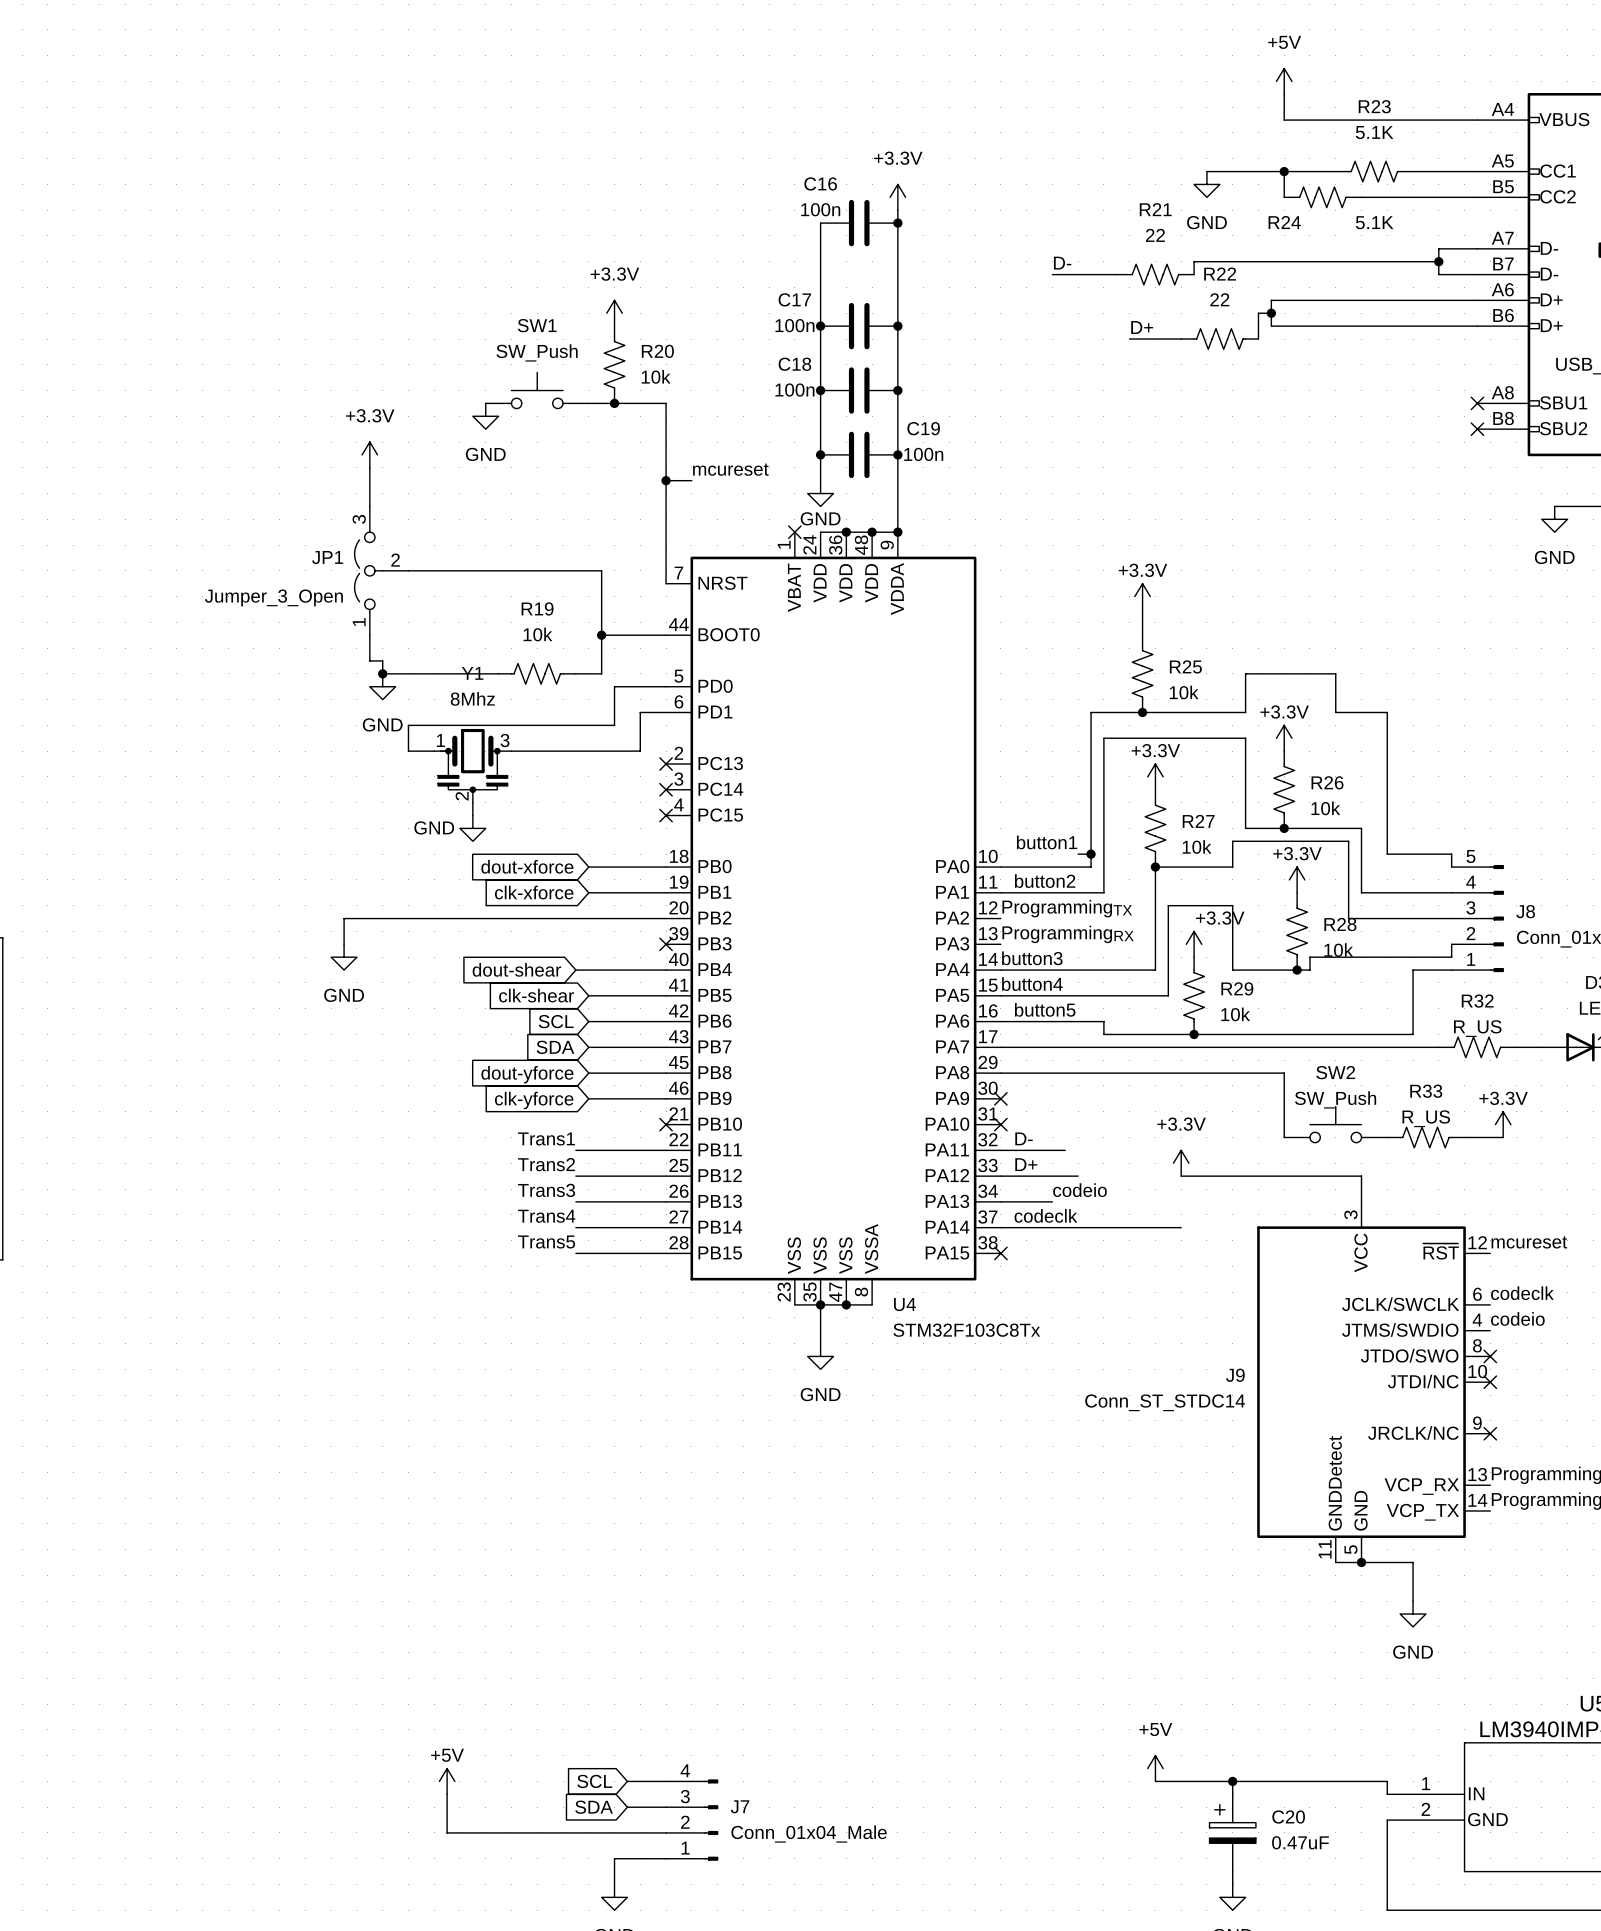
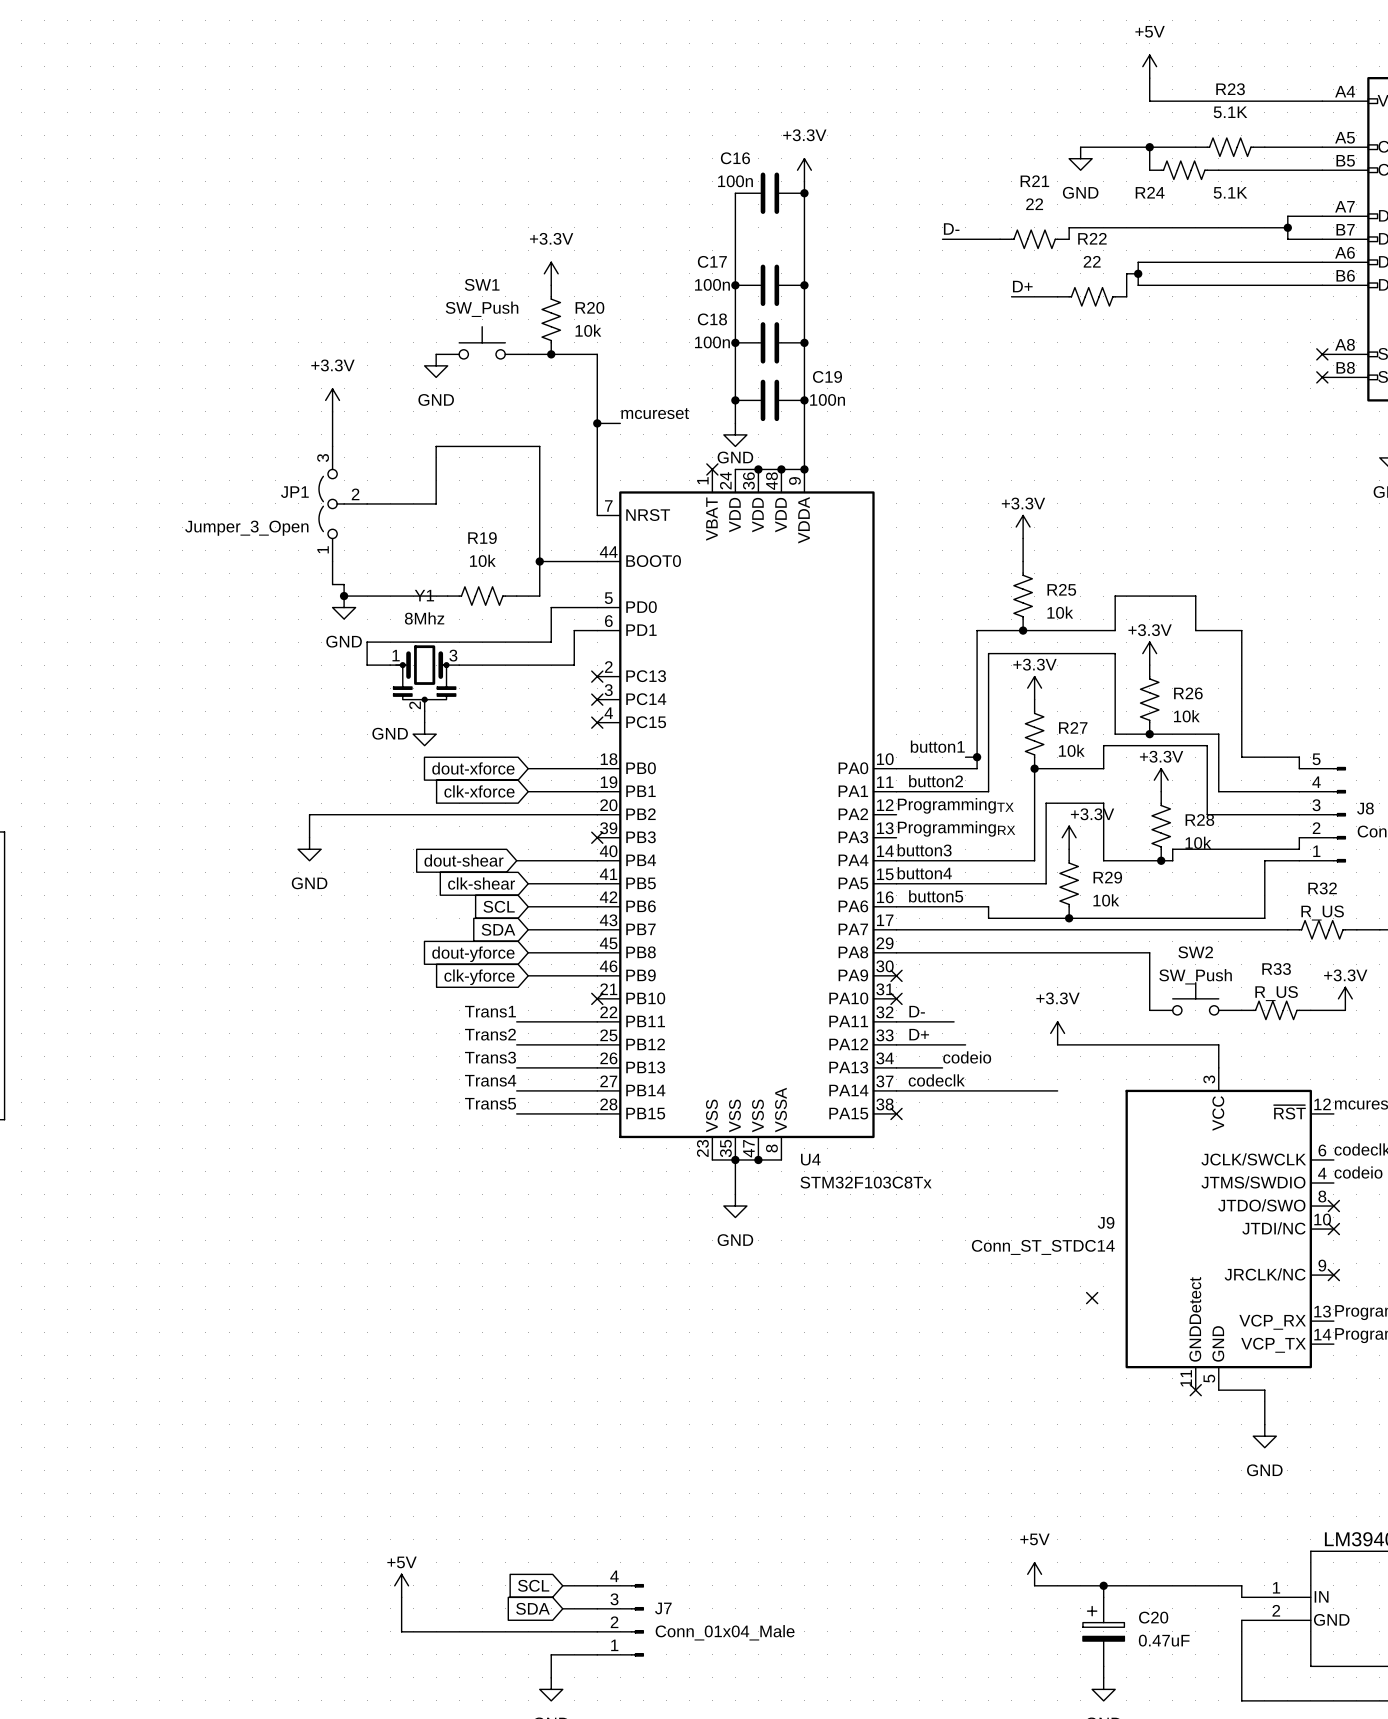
wire: (485, 570) (601, 570) -> (436, 503) (436, 446) (539, 446) (539, 503)
no-connect mark: none -> (1092, 1298)
wire: (1335, 1562) (1361, 1562) -> none
no-connect mark: none -> (1195, 1390)
junction: (1361, 1562) -> none

